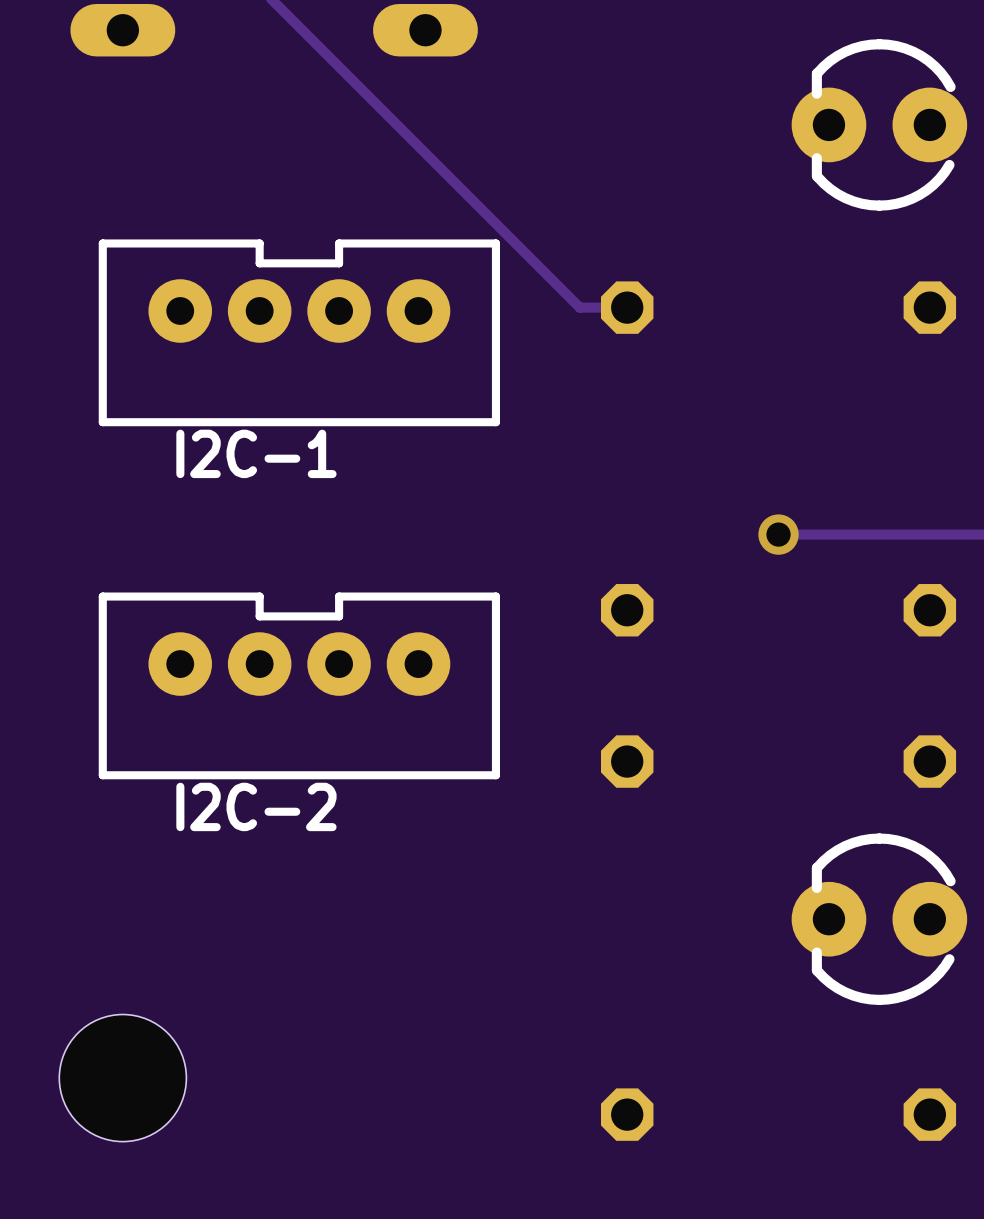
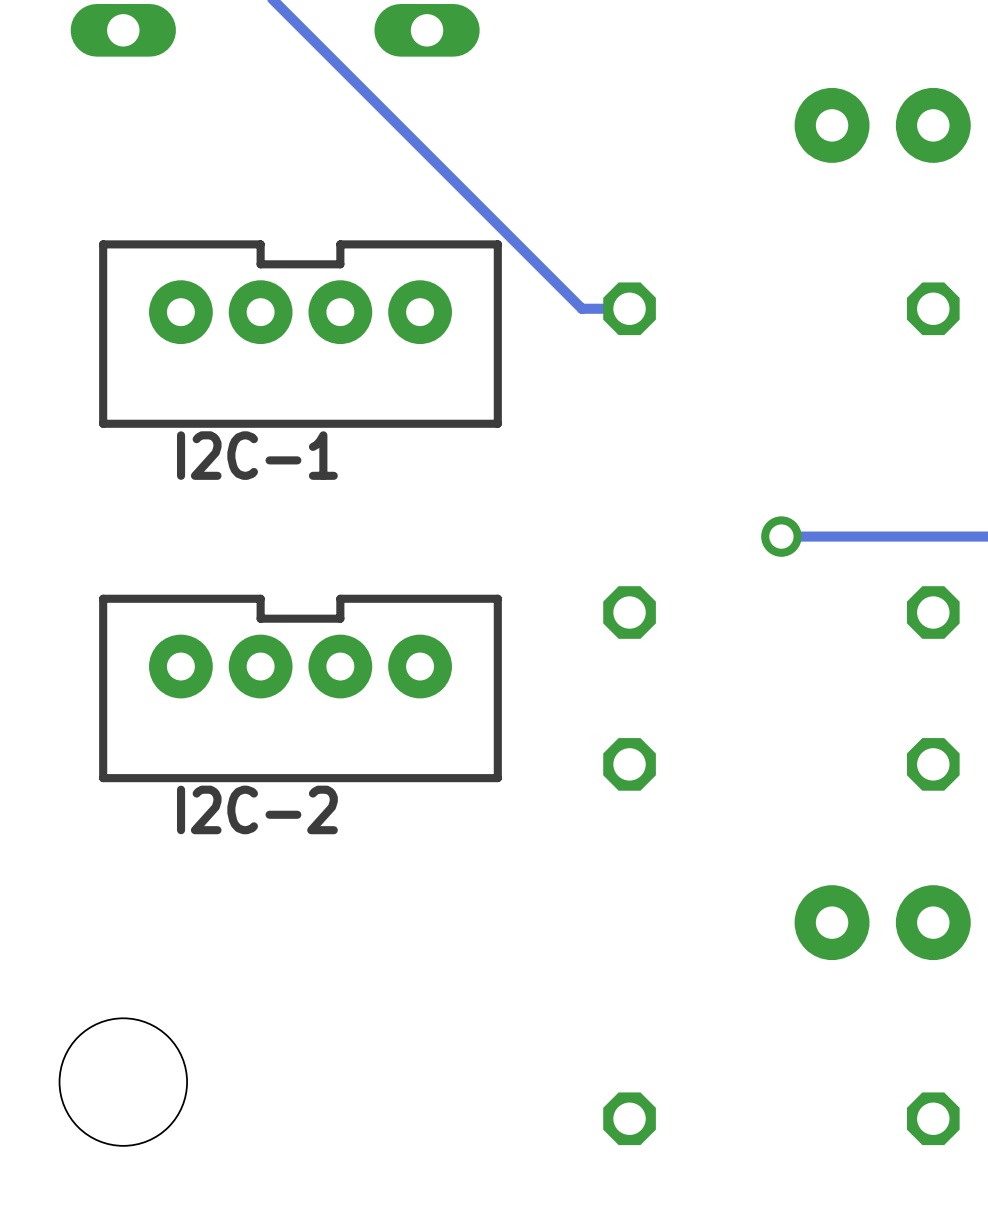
part footprint: [791, 39, 968, 211] -> [794, 87, 971, 163]
part footprint: [791, 833, 968, 1005] -> [794, 885, 971, 961]

